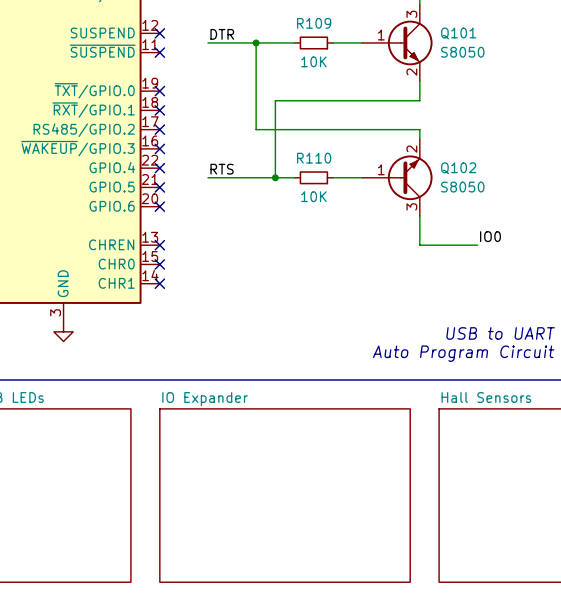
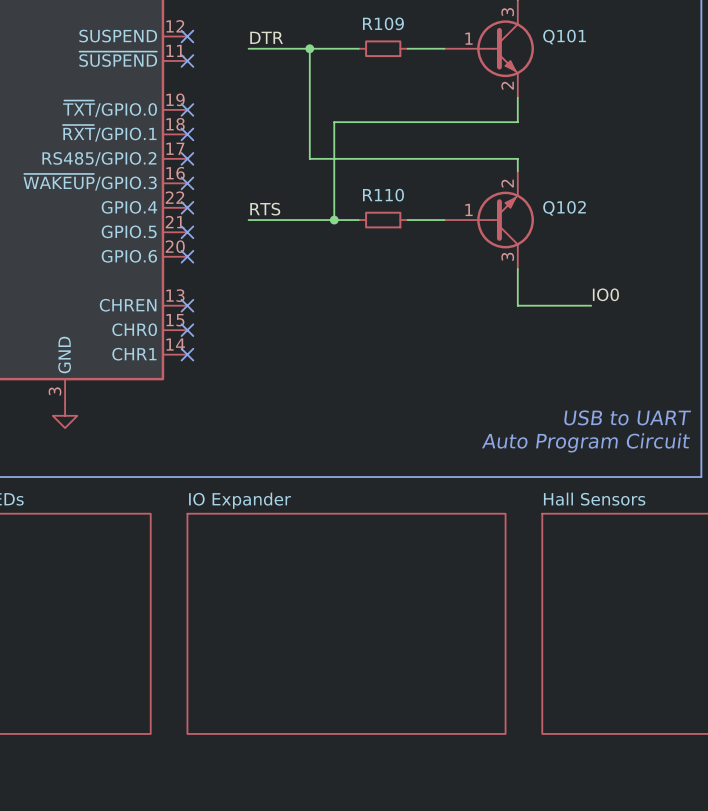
Q101 value: S8050 (462, 52) -> none
R109 value: 10K (313, 61) -> none
Q102 value: S8050 (462, 187) -> none
R110 value: 10K (313, 196) -> none

